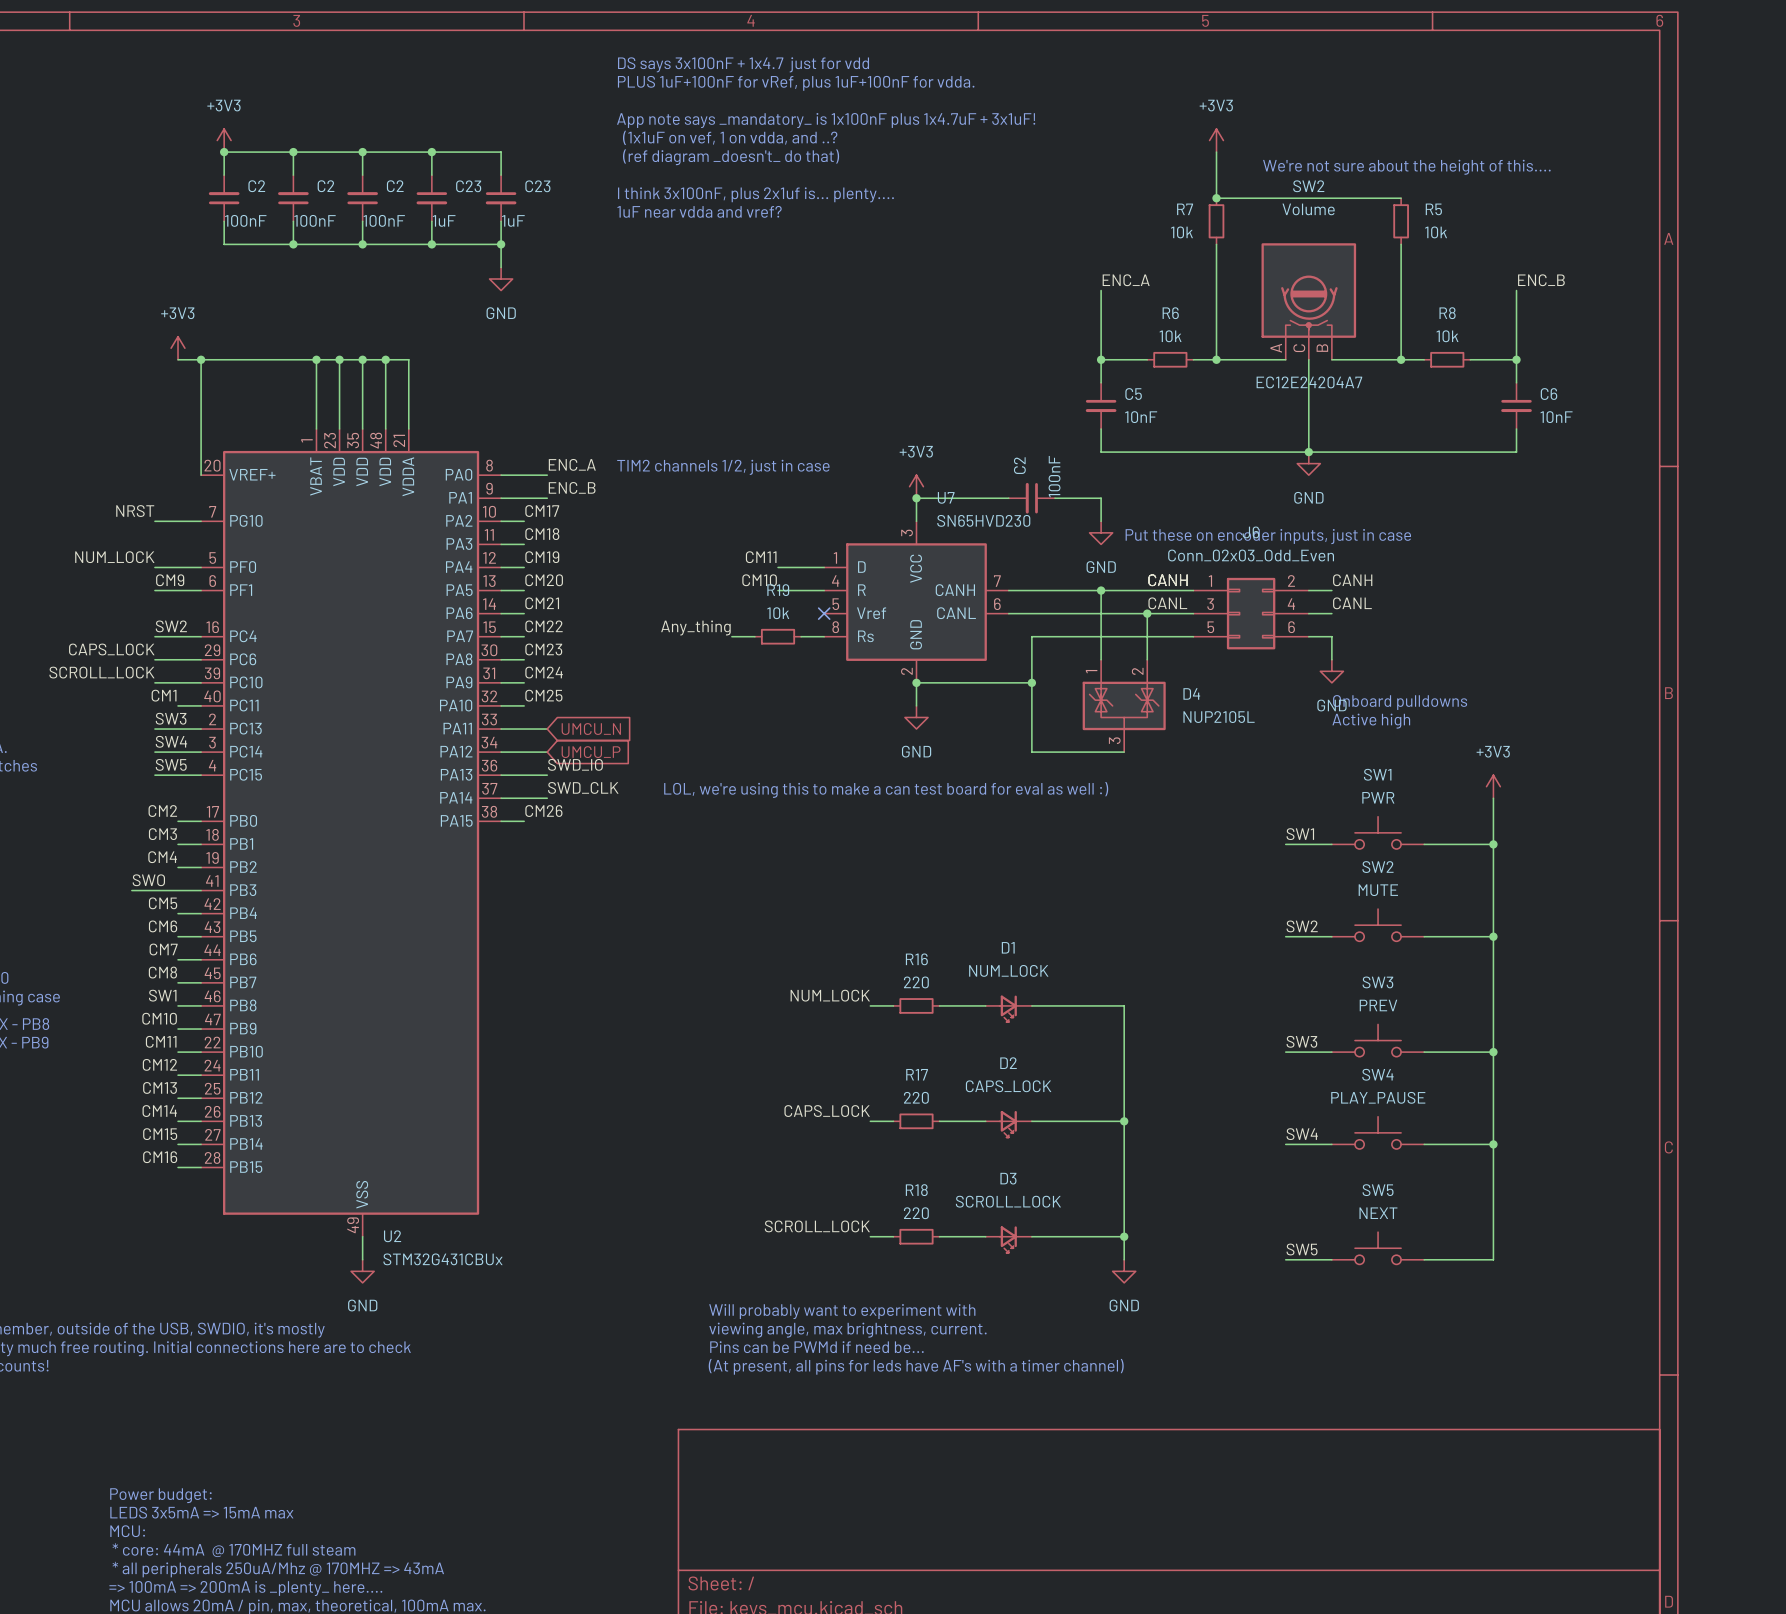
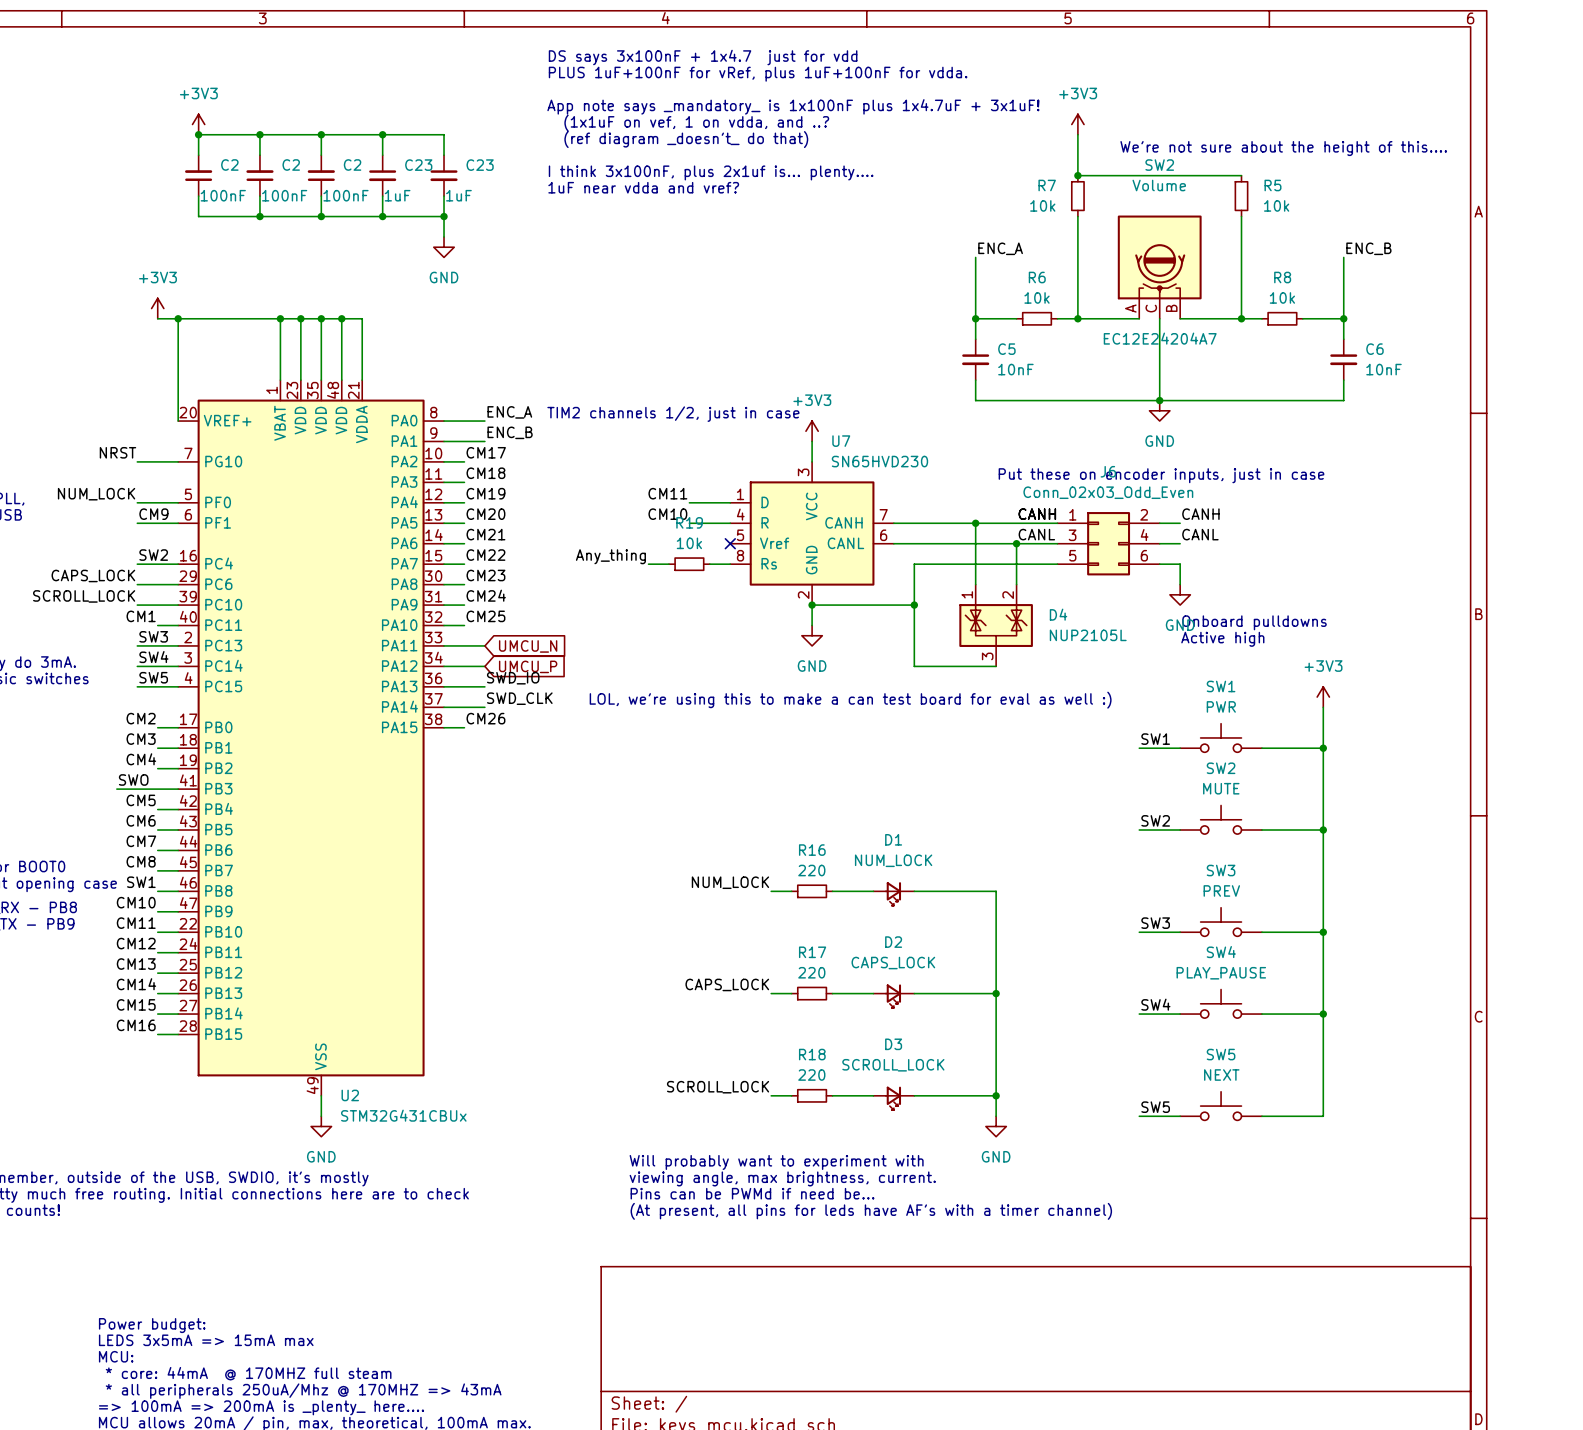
wire: (916, 498) (1008, 498) -> none
junction: (916, 498) -> none
C2: 100nF (1031, 498) -> none
wire: (1054, 498) (1101, 498) (1101, 521) -> none
power symbol: GND (1101, 532) -> none

